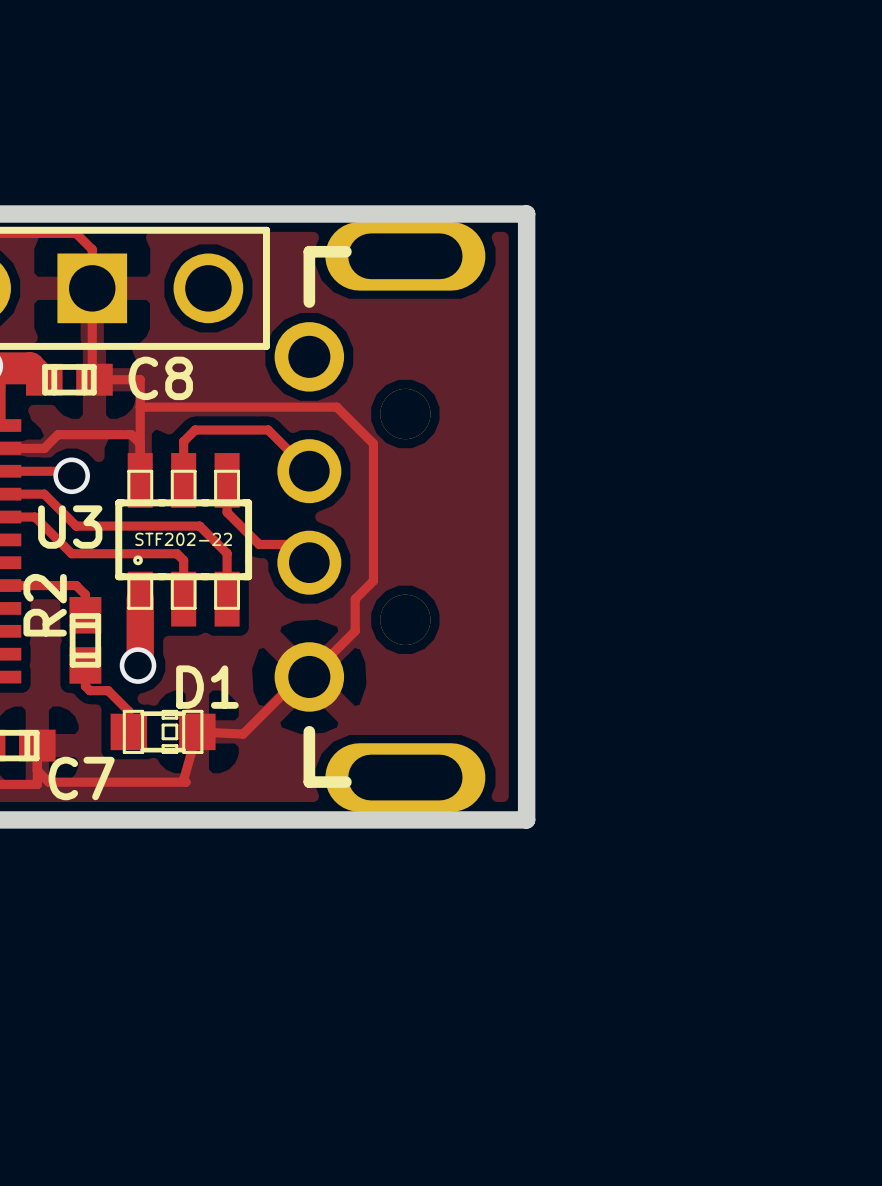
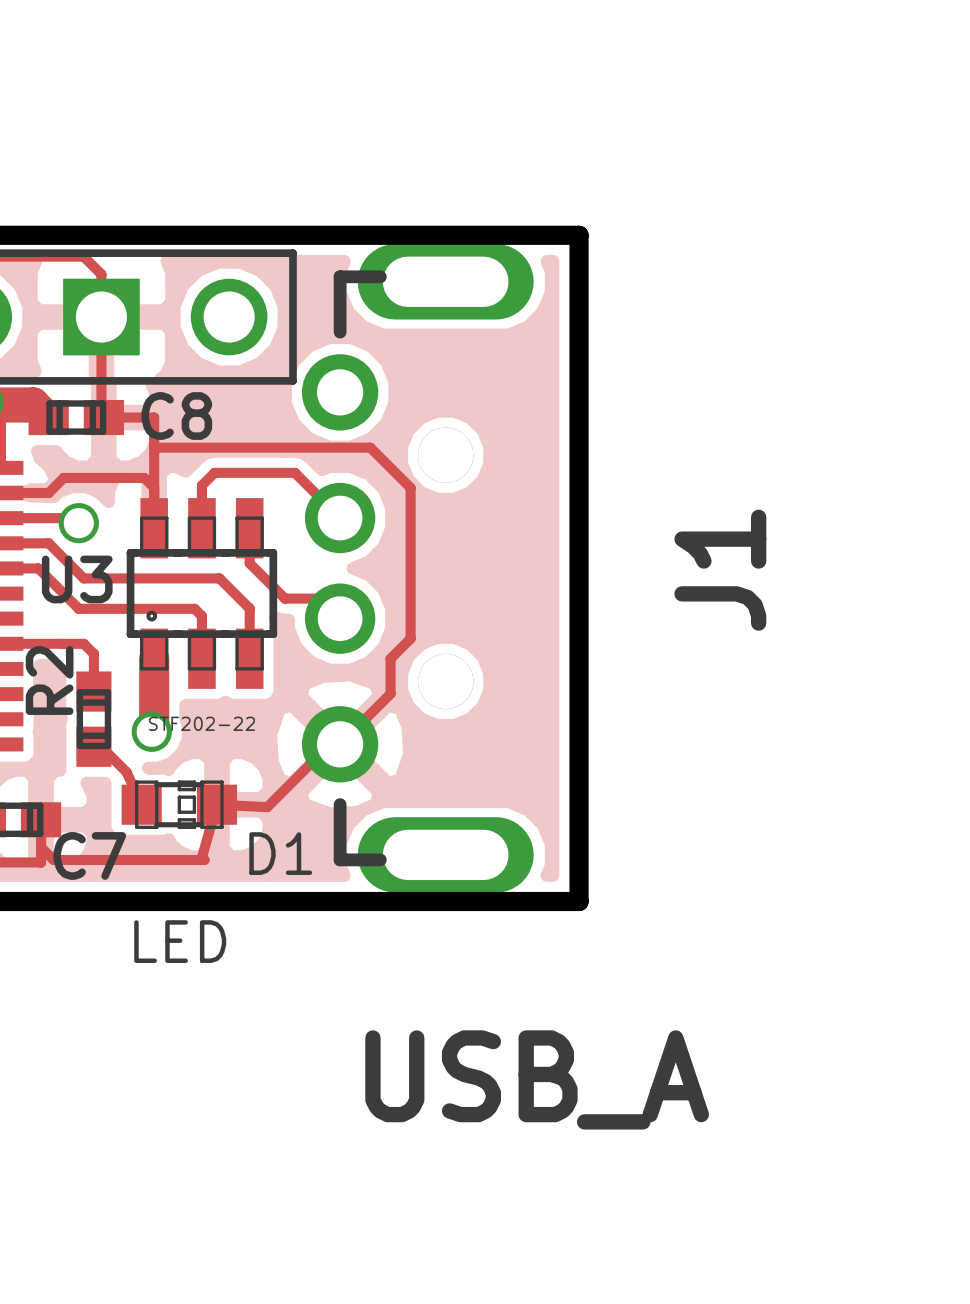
J1 name: none -> J1 (720, 570)
U3 value position: STF202-22 (183, 539) -> STF202-22 (201, 723)
R2 position: (85, 640) -> (93, 719)
track: (85, 665) (85, 686) (89, 690) (108, 690) (128, 711) (128, 731) -> (93, 746) (101, 746) (126, 772) (141, 804)
D1 name position: D1 (207, 687) -> D1 (280, 853)
D1 value: none -> LED (180, 941)
J1 value: none -> USB_A (537, 1079)

